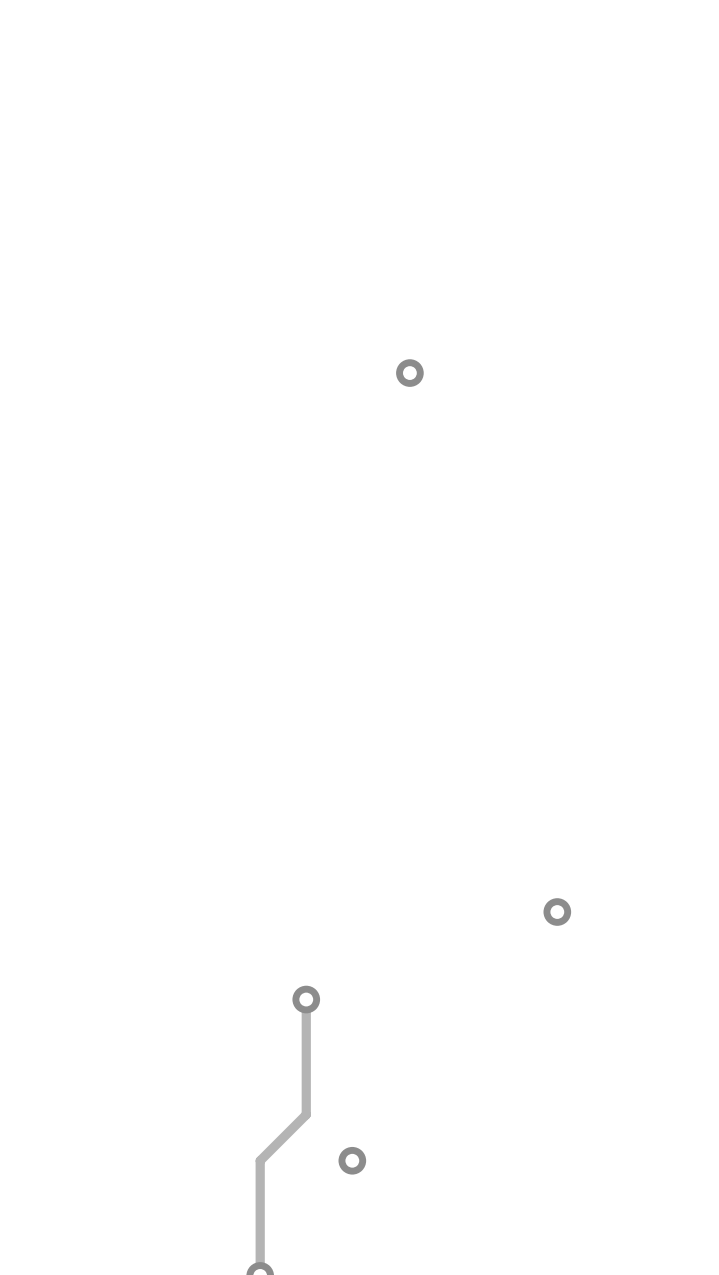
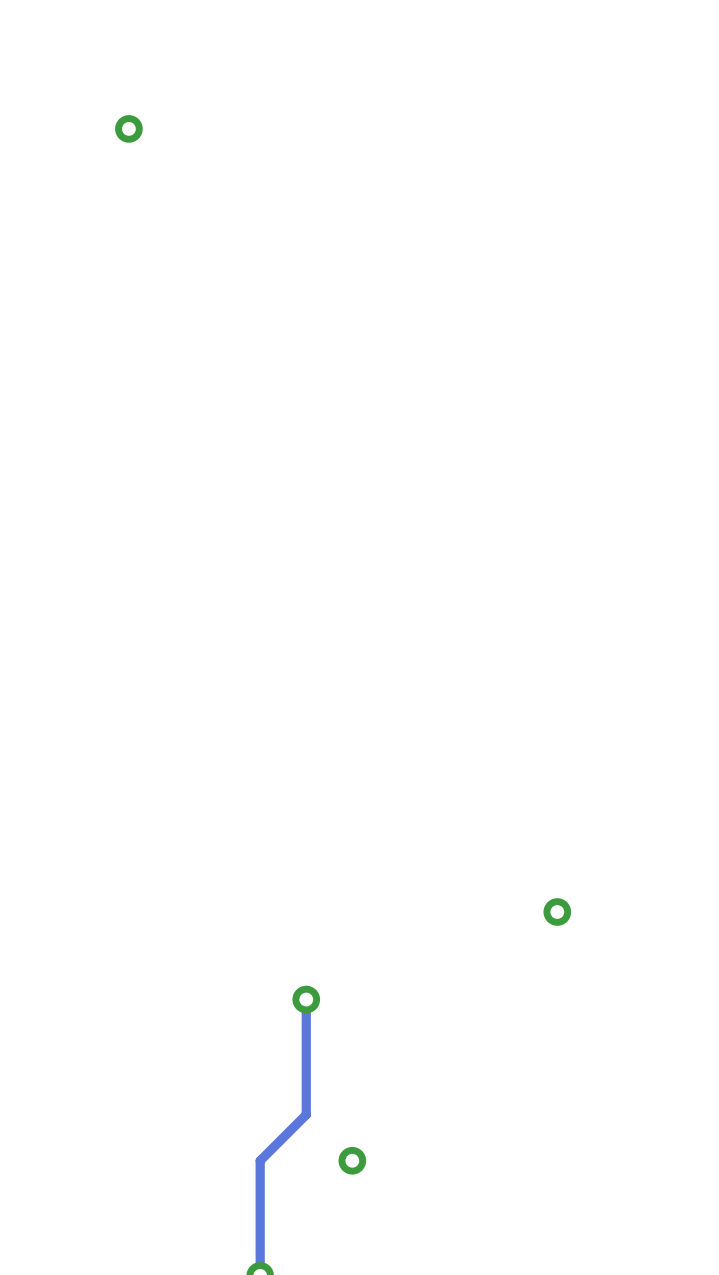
via: none -> (128, 128)
via: (409, 373) -> none

